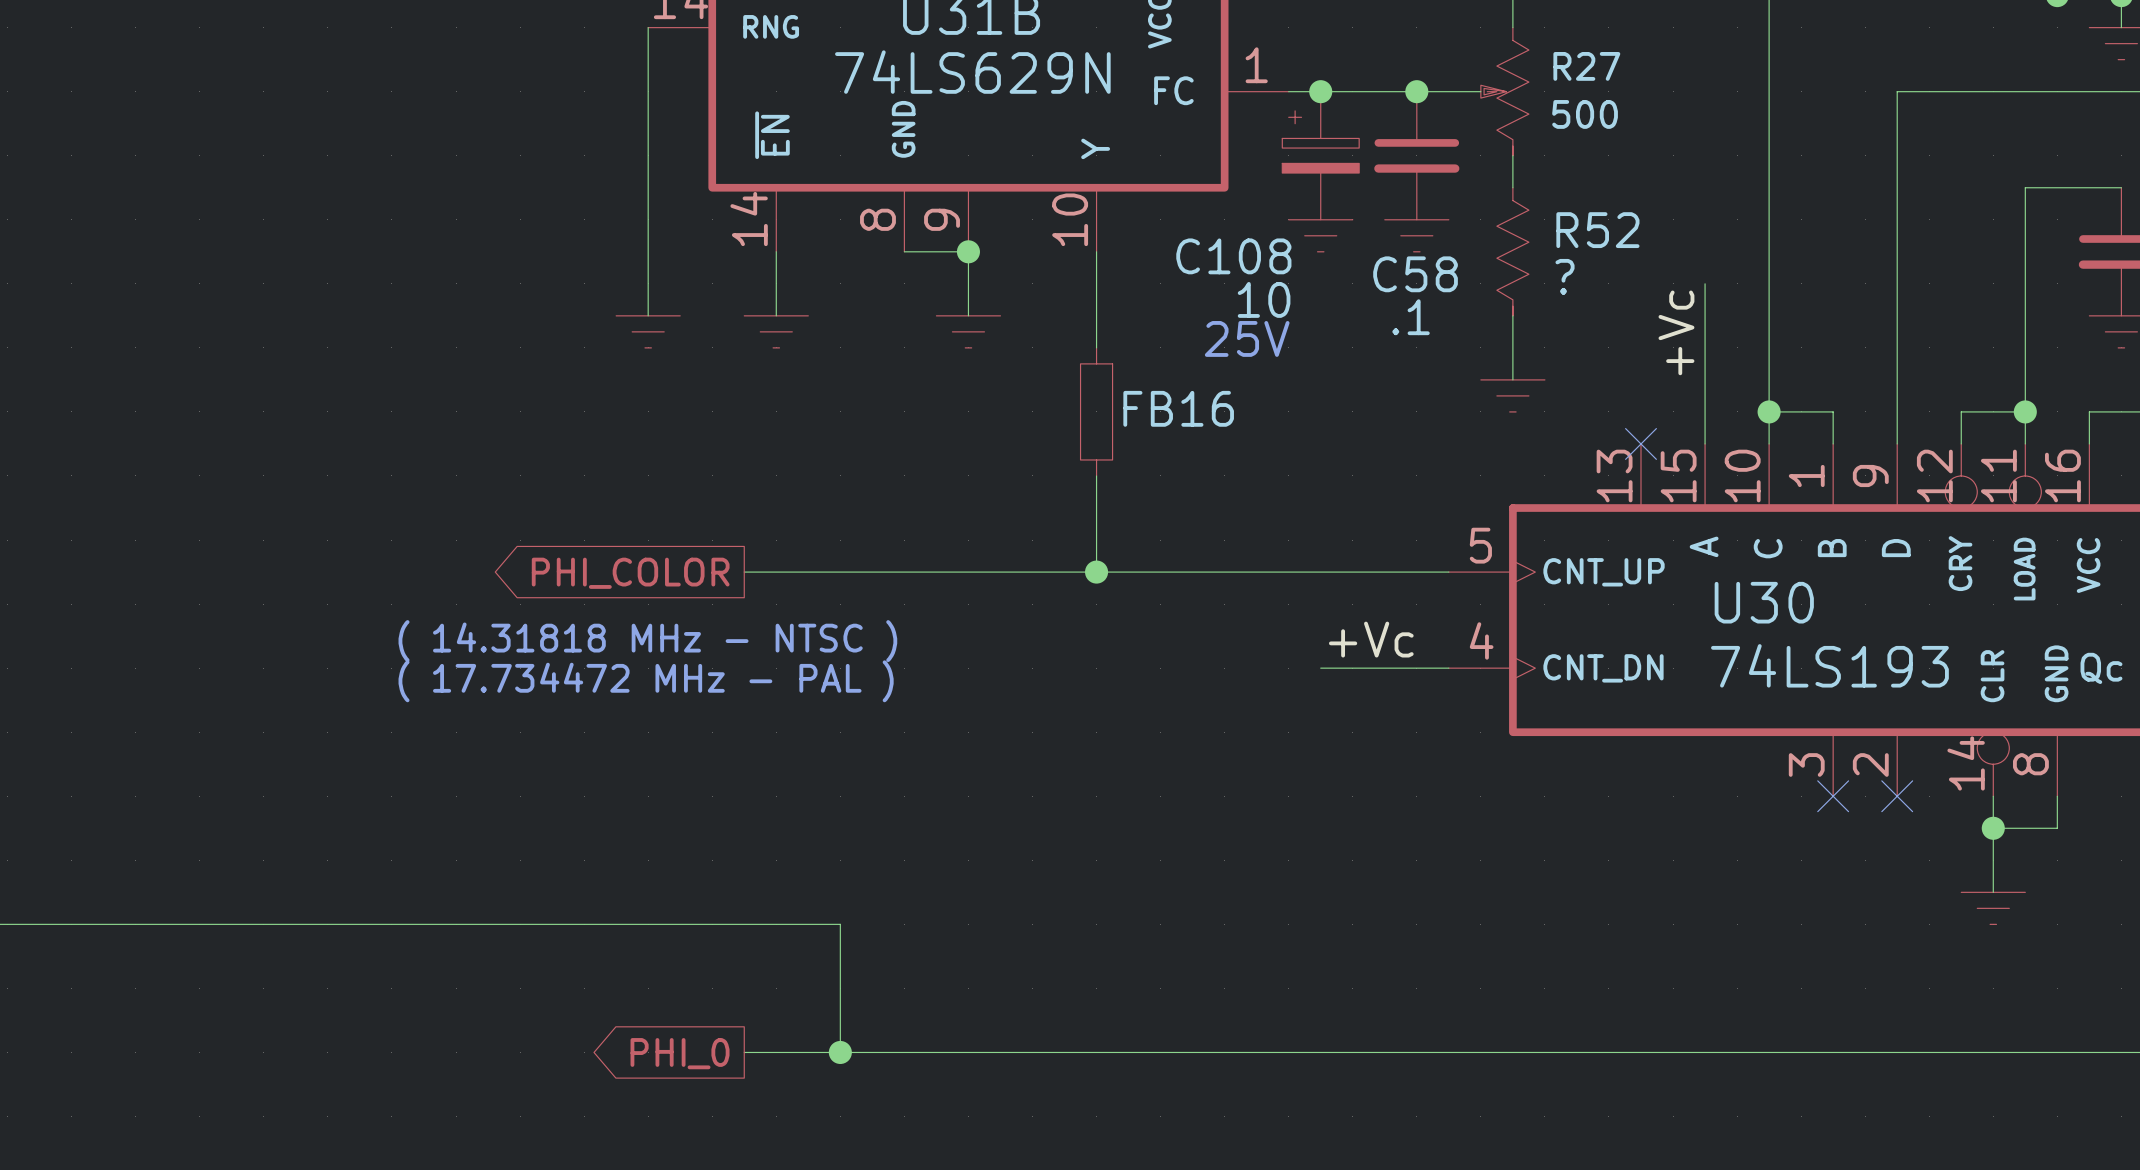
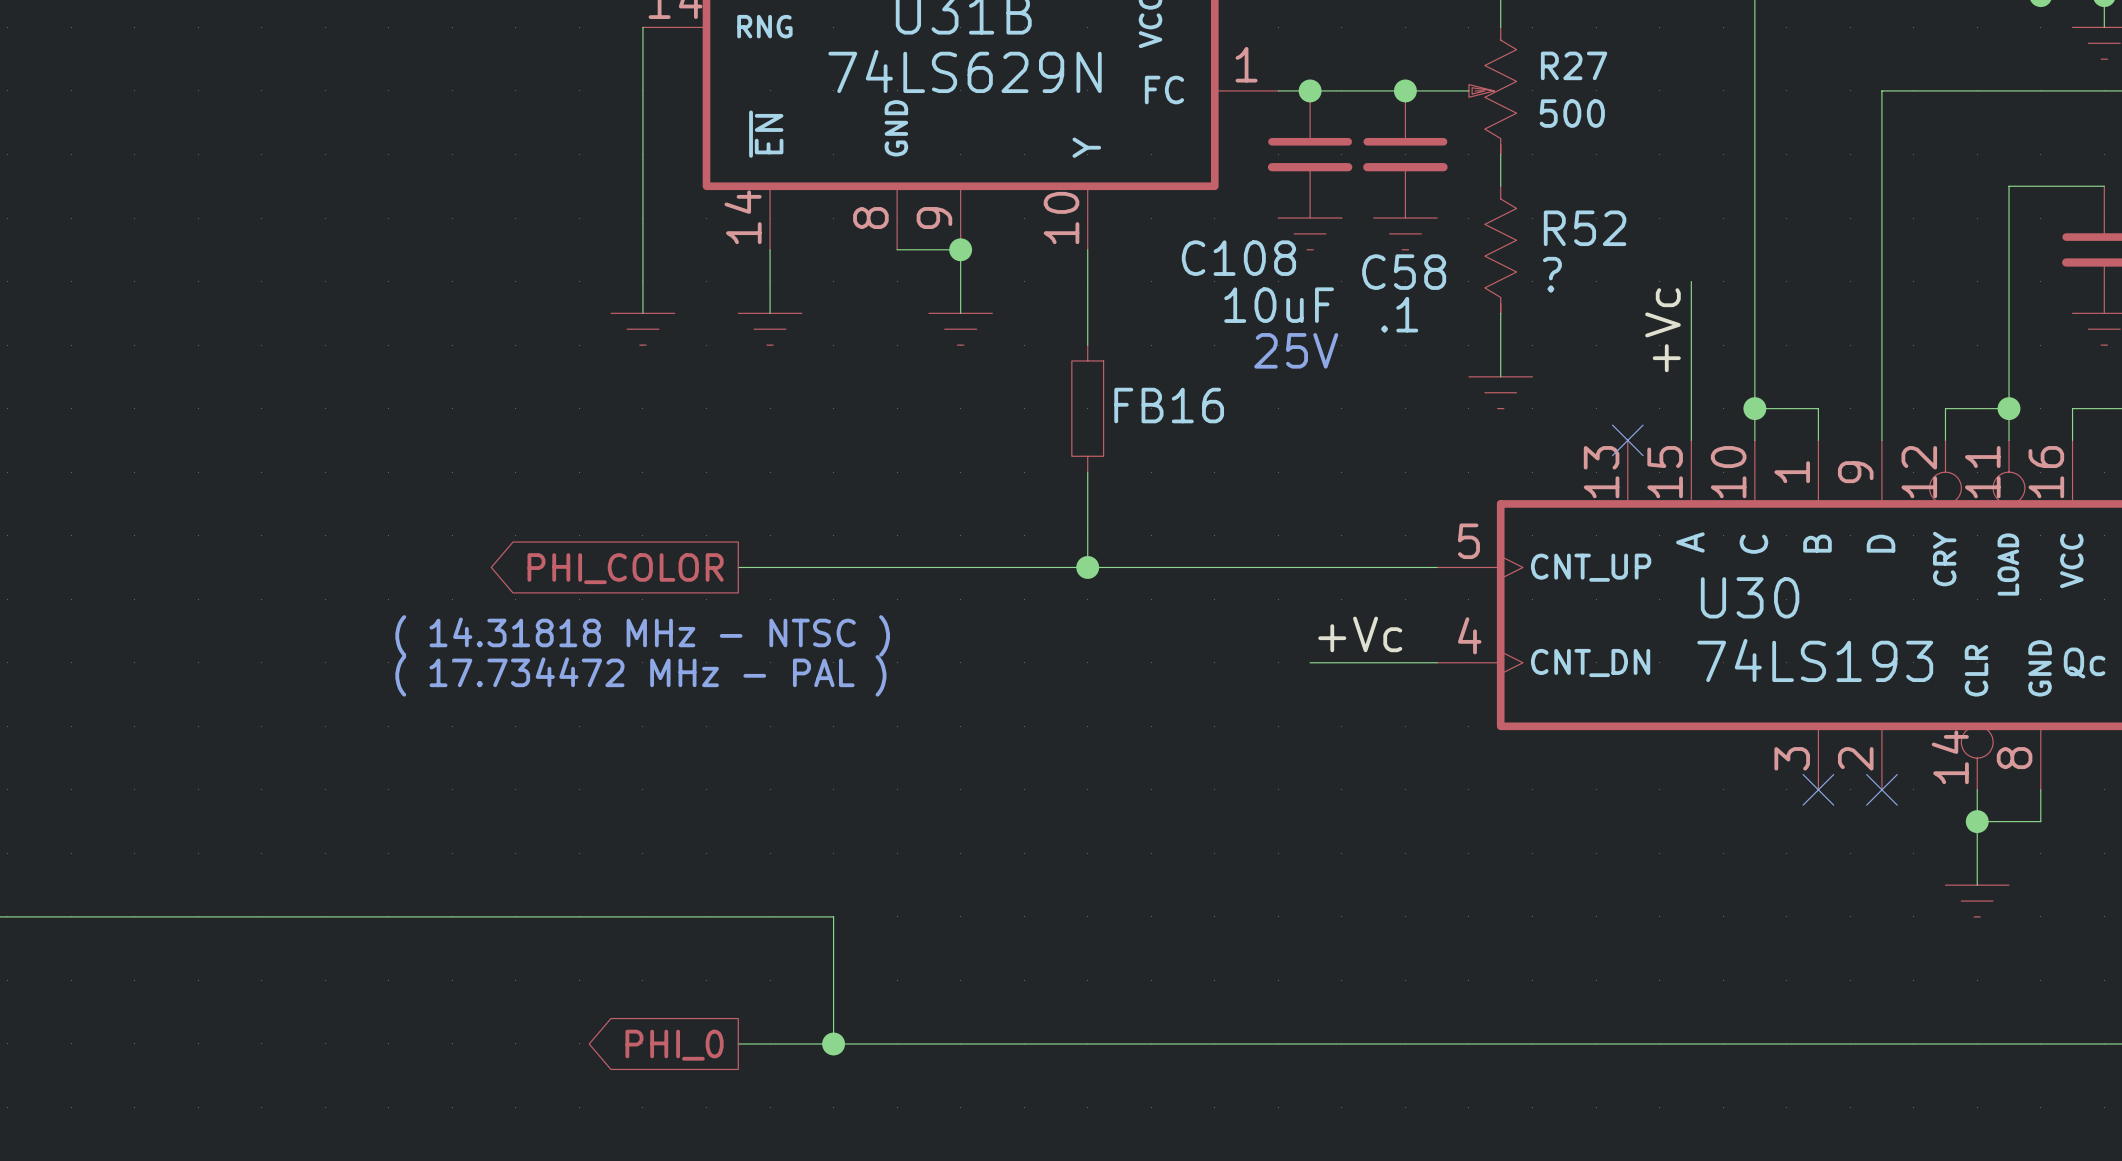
C108 symbol: [1282, 91, 1360, 220] -> [1267, 90, 1353, 219]
C108 value: 10 (1264, 299) -> 10uF (1279, 305)
text position: 25V (1247, 338) -> 25V (1296, 350)

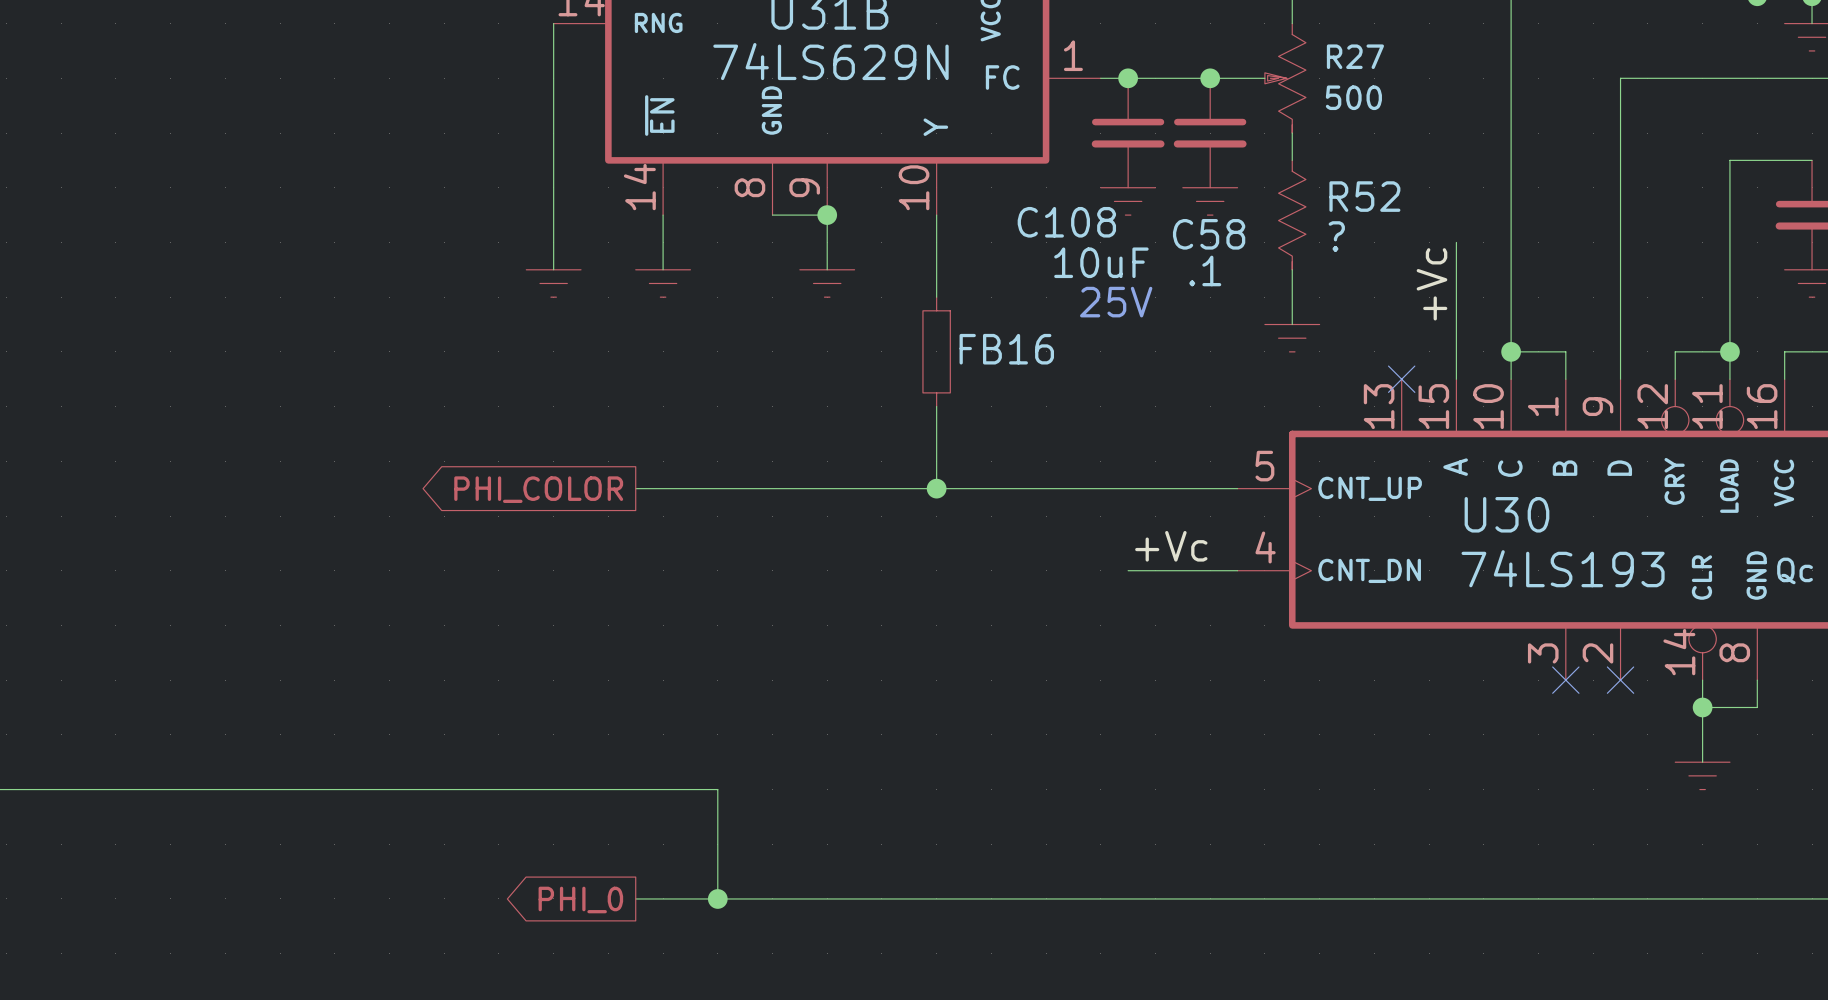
text: ( 14.31818 MHz - NTSC ) (642, 635) -> none
text: ( 17.734472 MHz - PAL ) (640, 675) -> none

